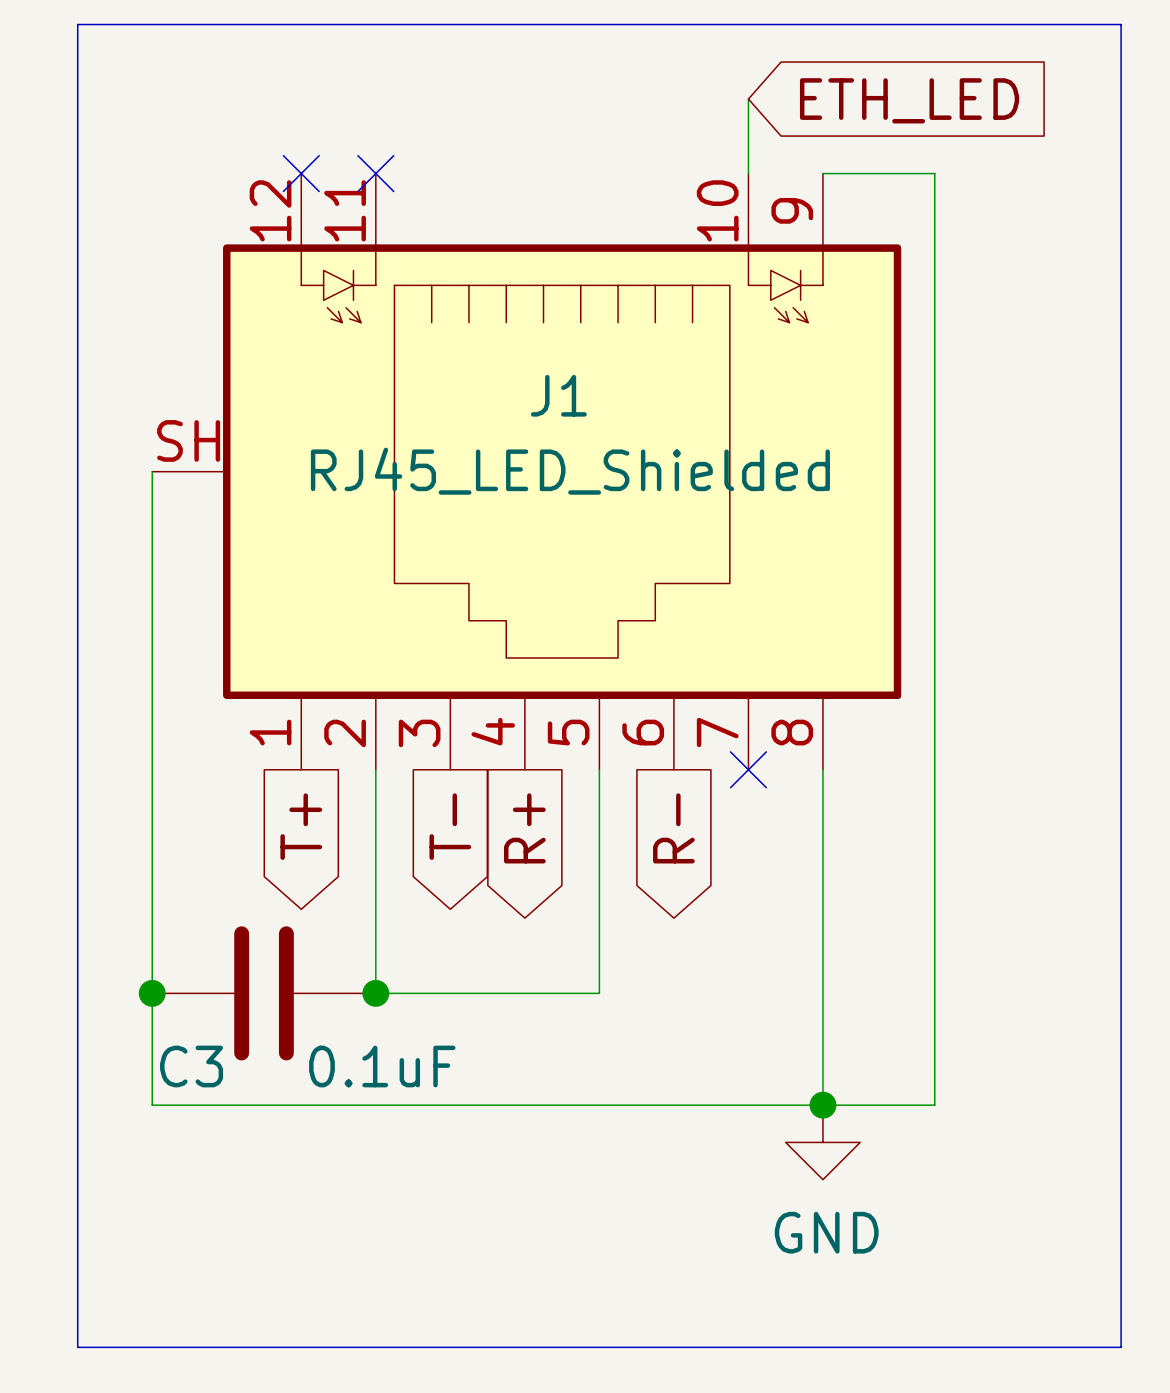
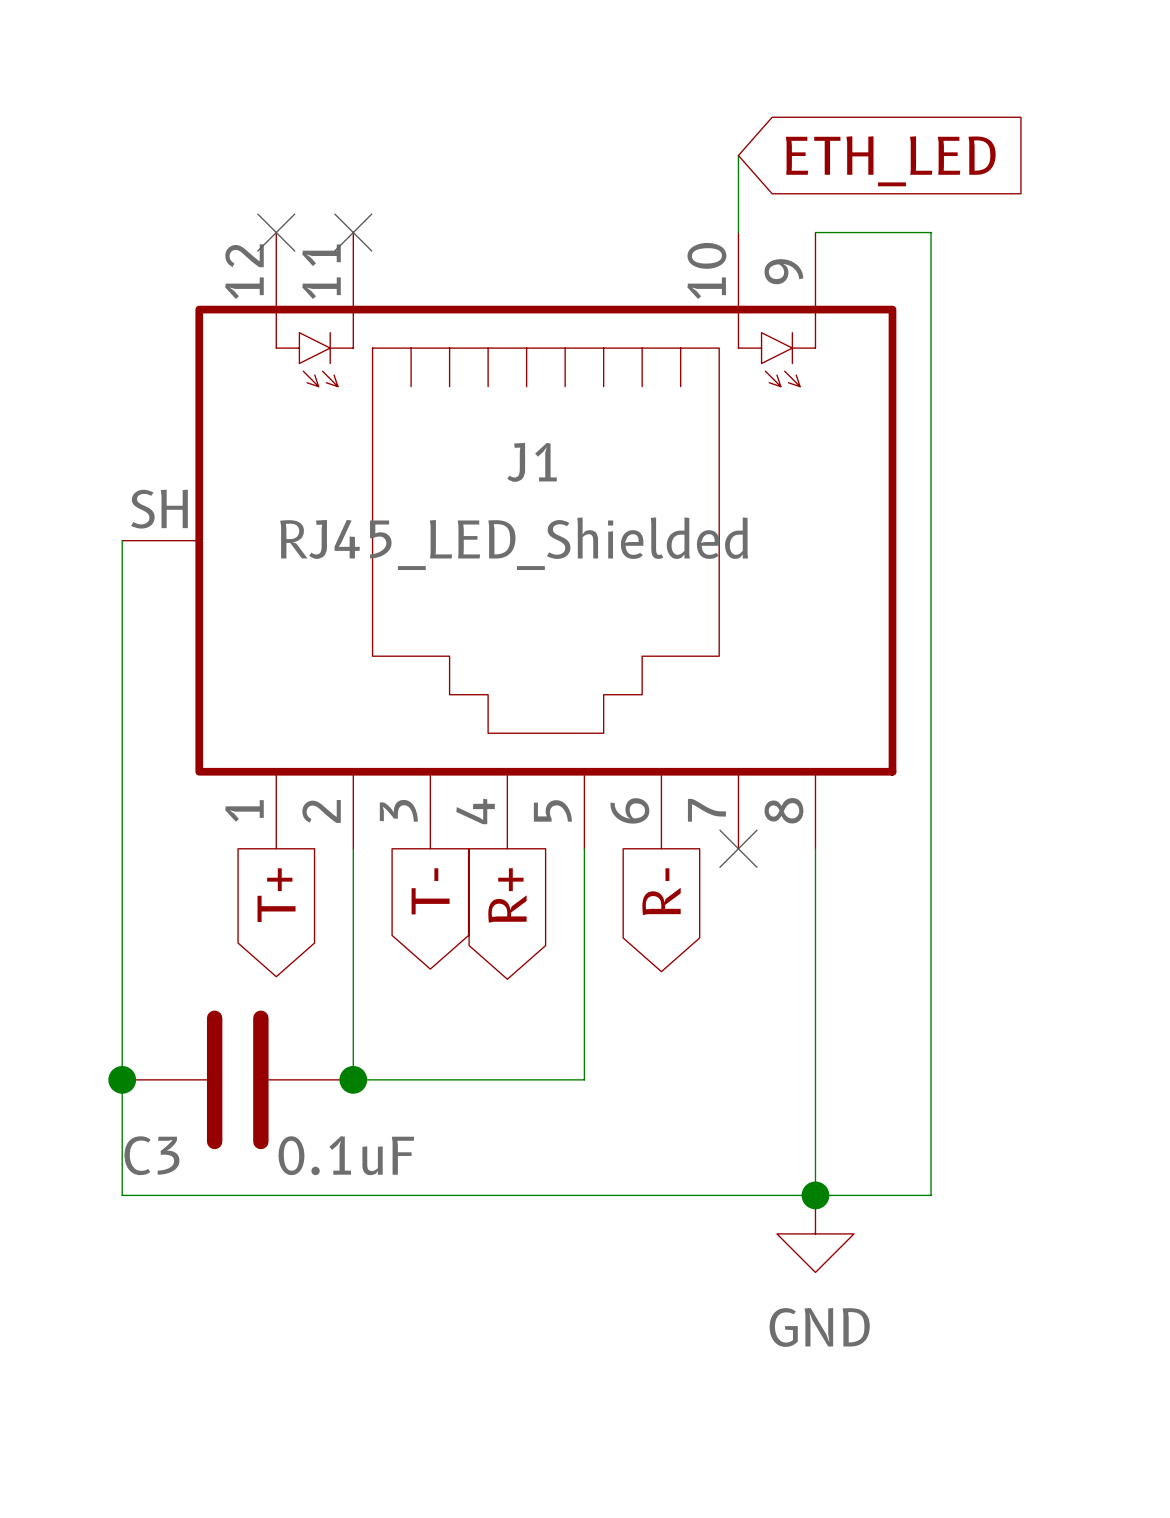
line: (77, 24) (1121, 24) (1121, 1347) (77, 1347) (77, 24) -> none

